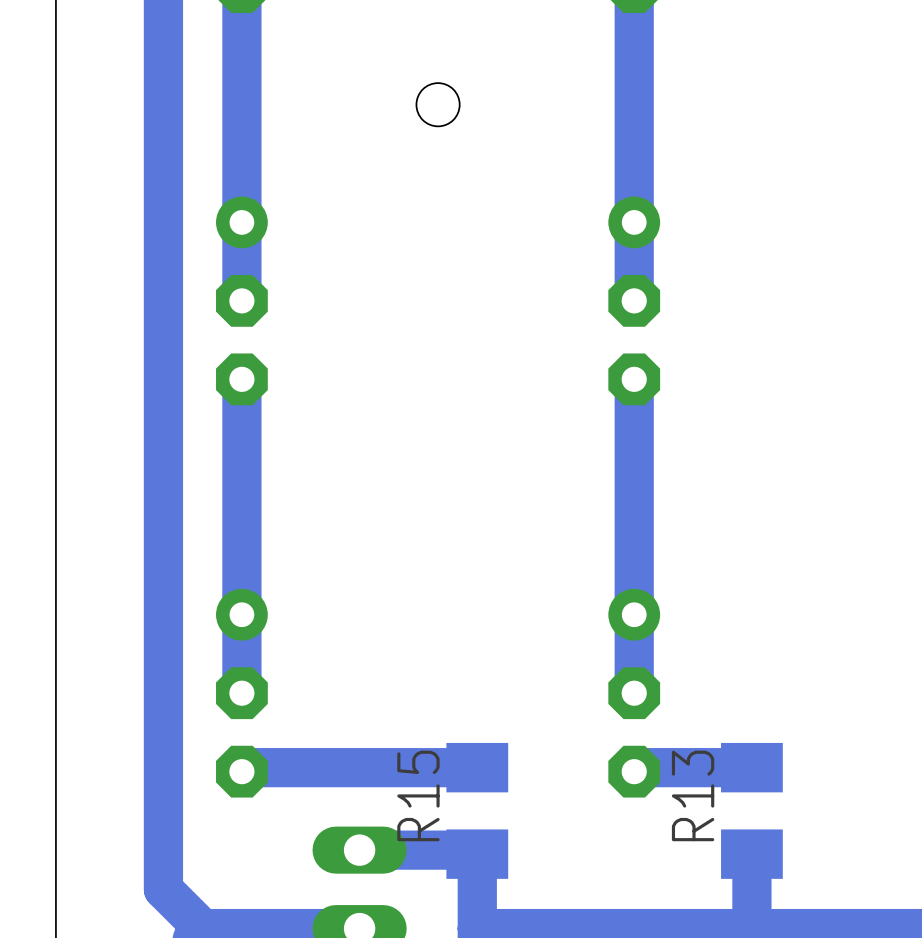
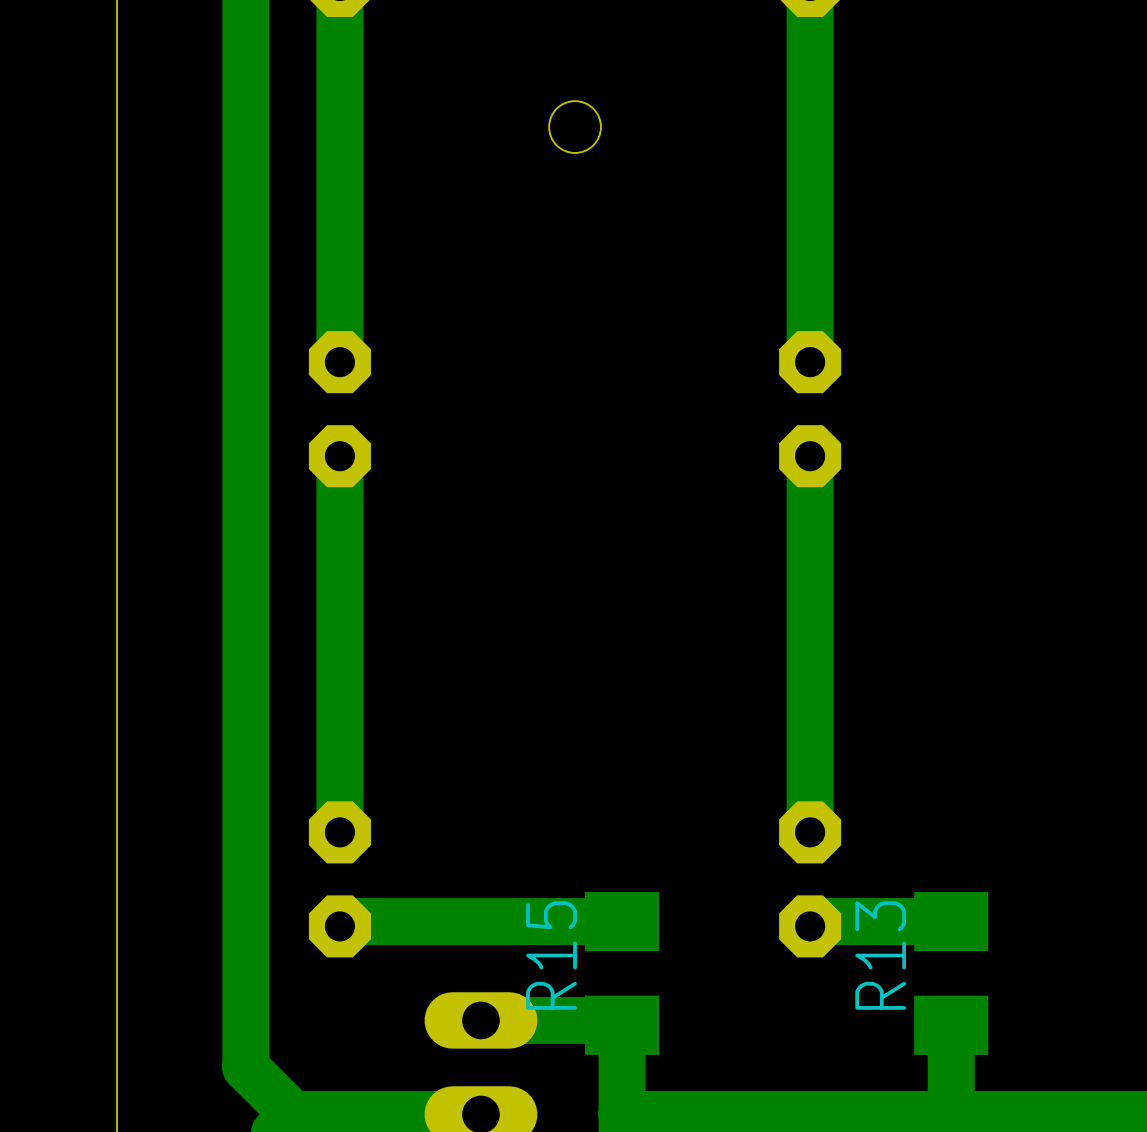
via: (241, 222) -> none
via: (634, 222) -> none
via: (241, 614) -> none
via: (634, 614) -> none

